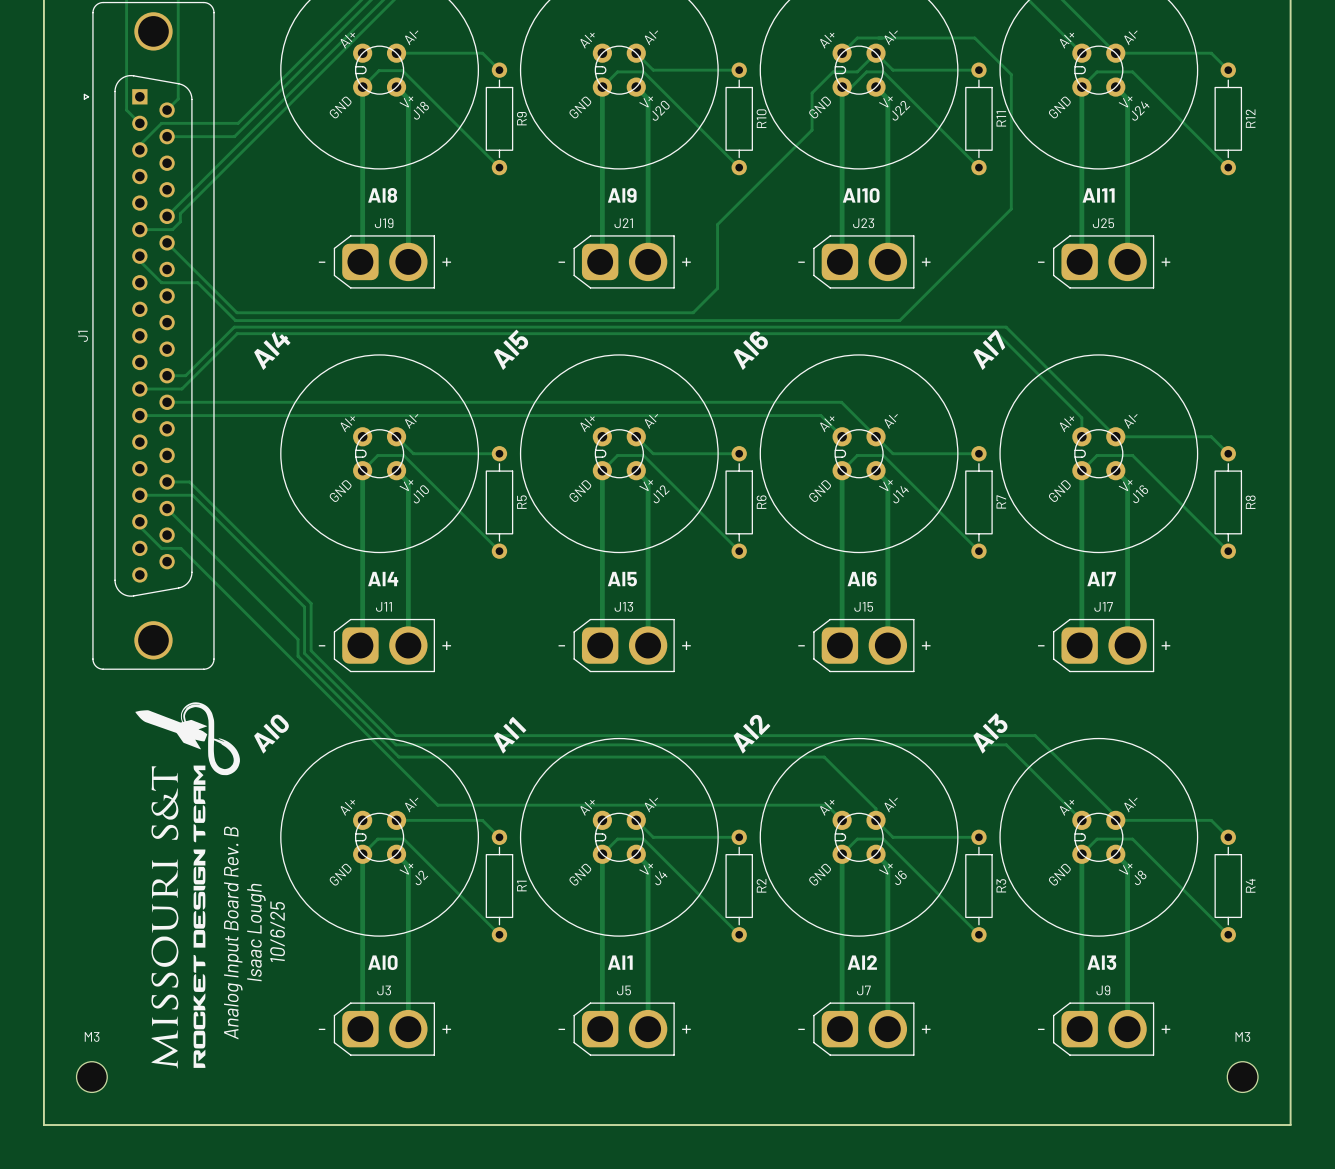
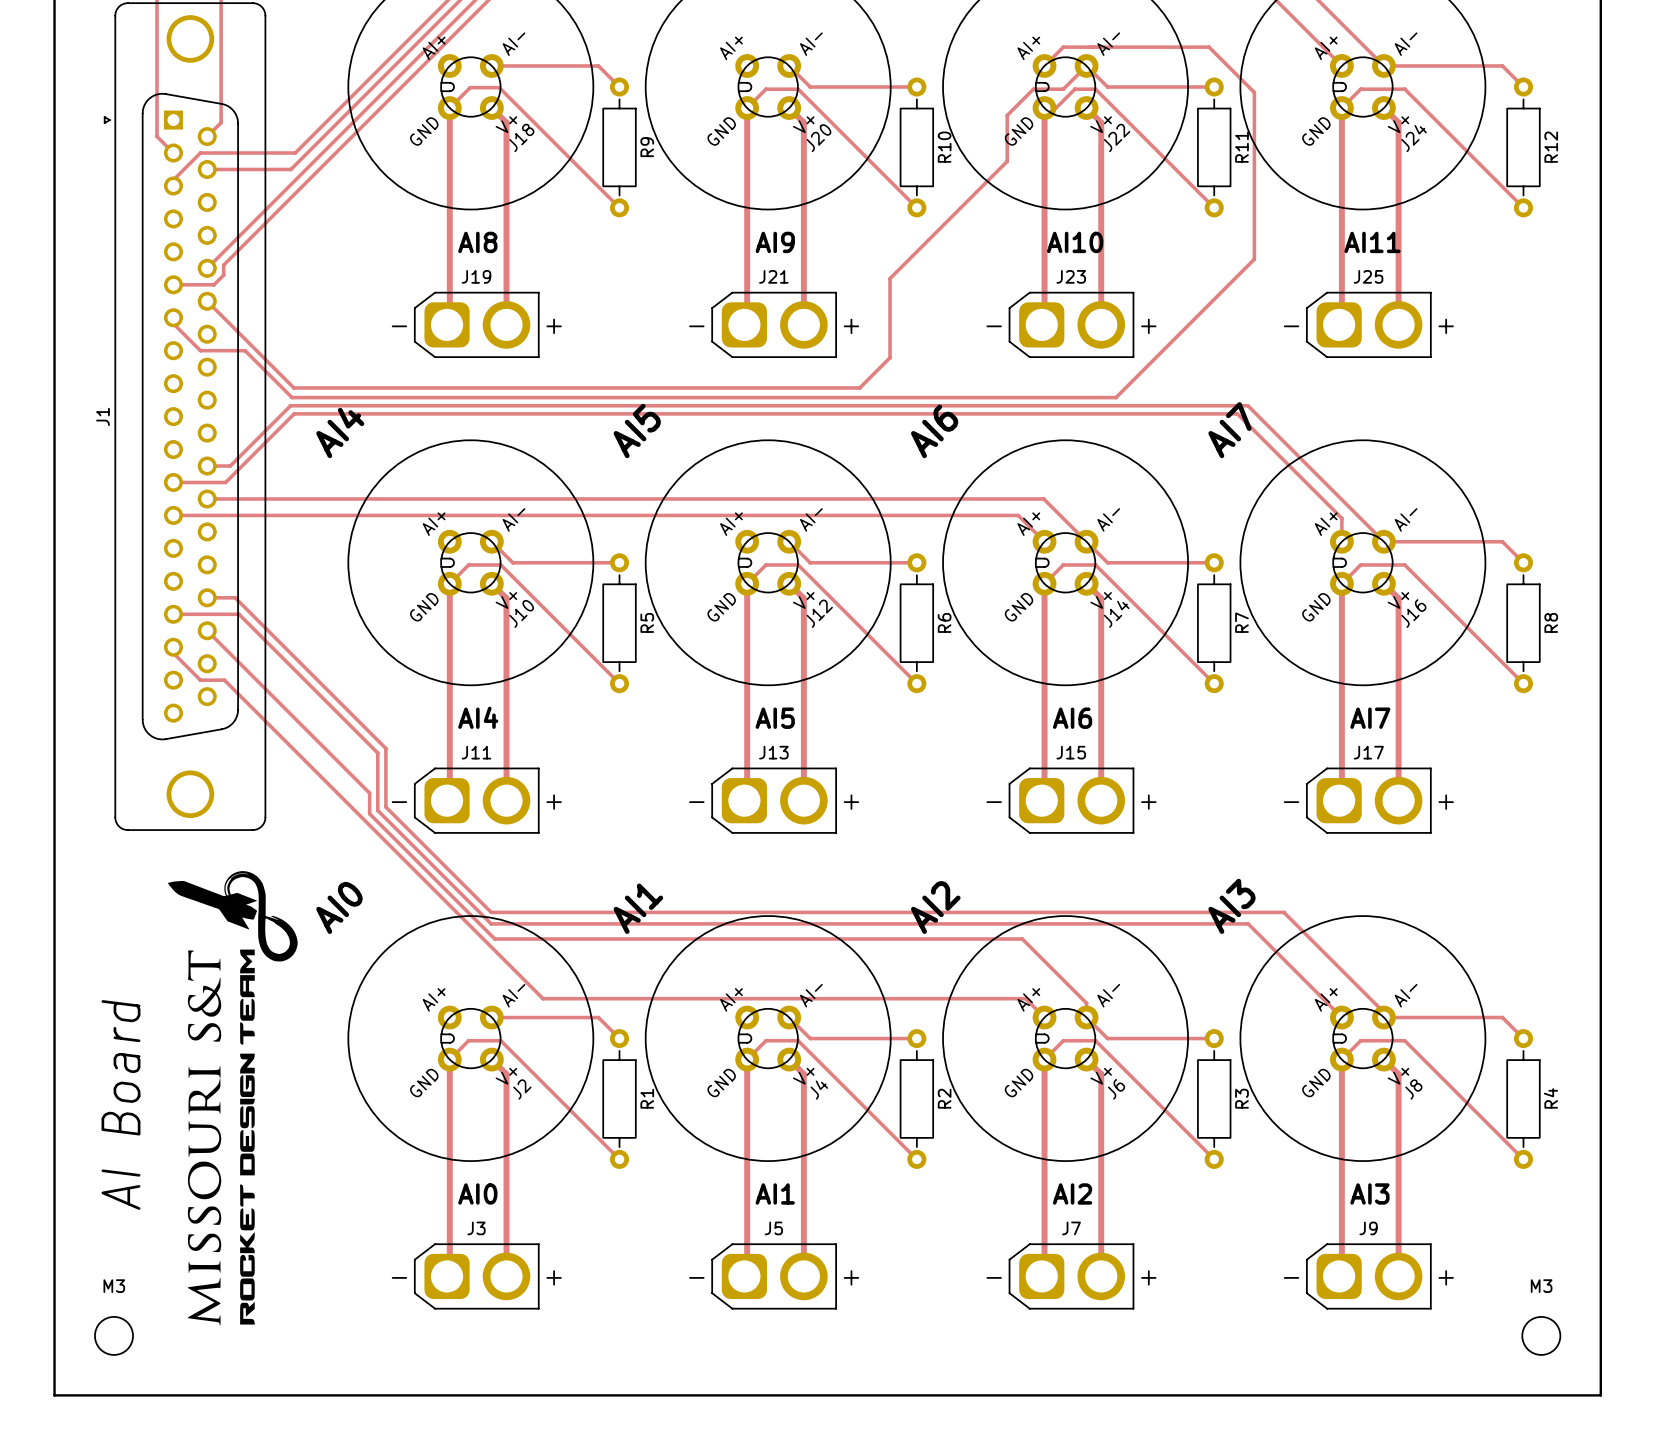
text: none -> AI Board (120, 1104)
text: 10/6/25 (277, 931) -> none
text: Analog Input Board Rev. B (233, 932) -> none
text: Isaac Lough (256, 932) -> none

